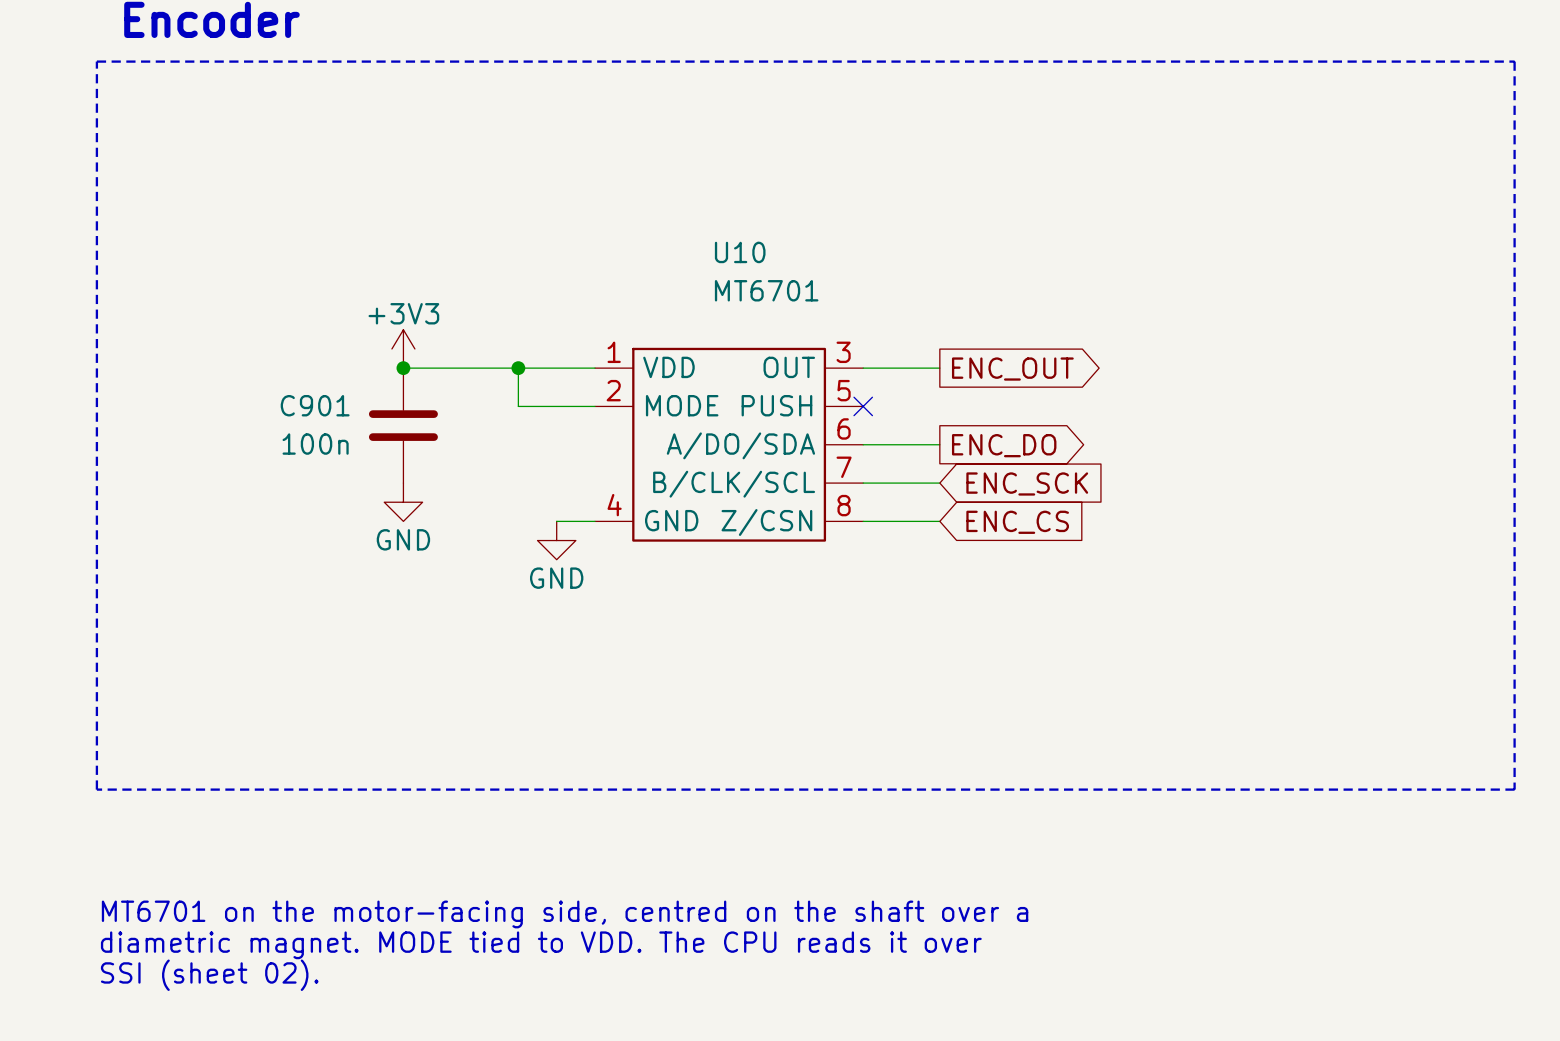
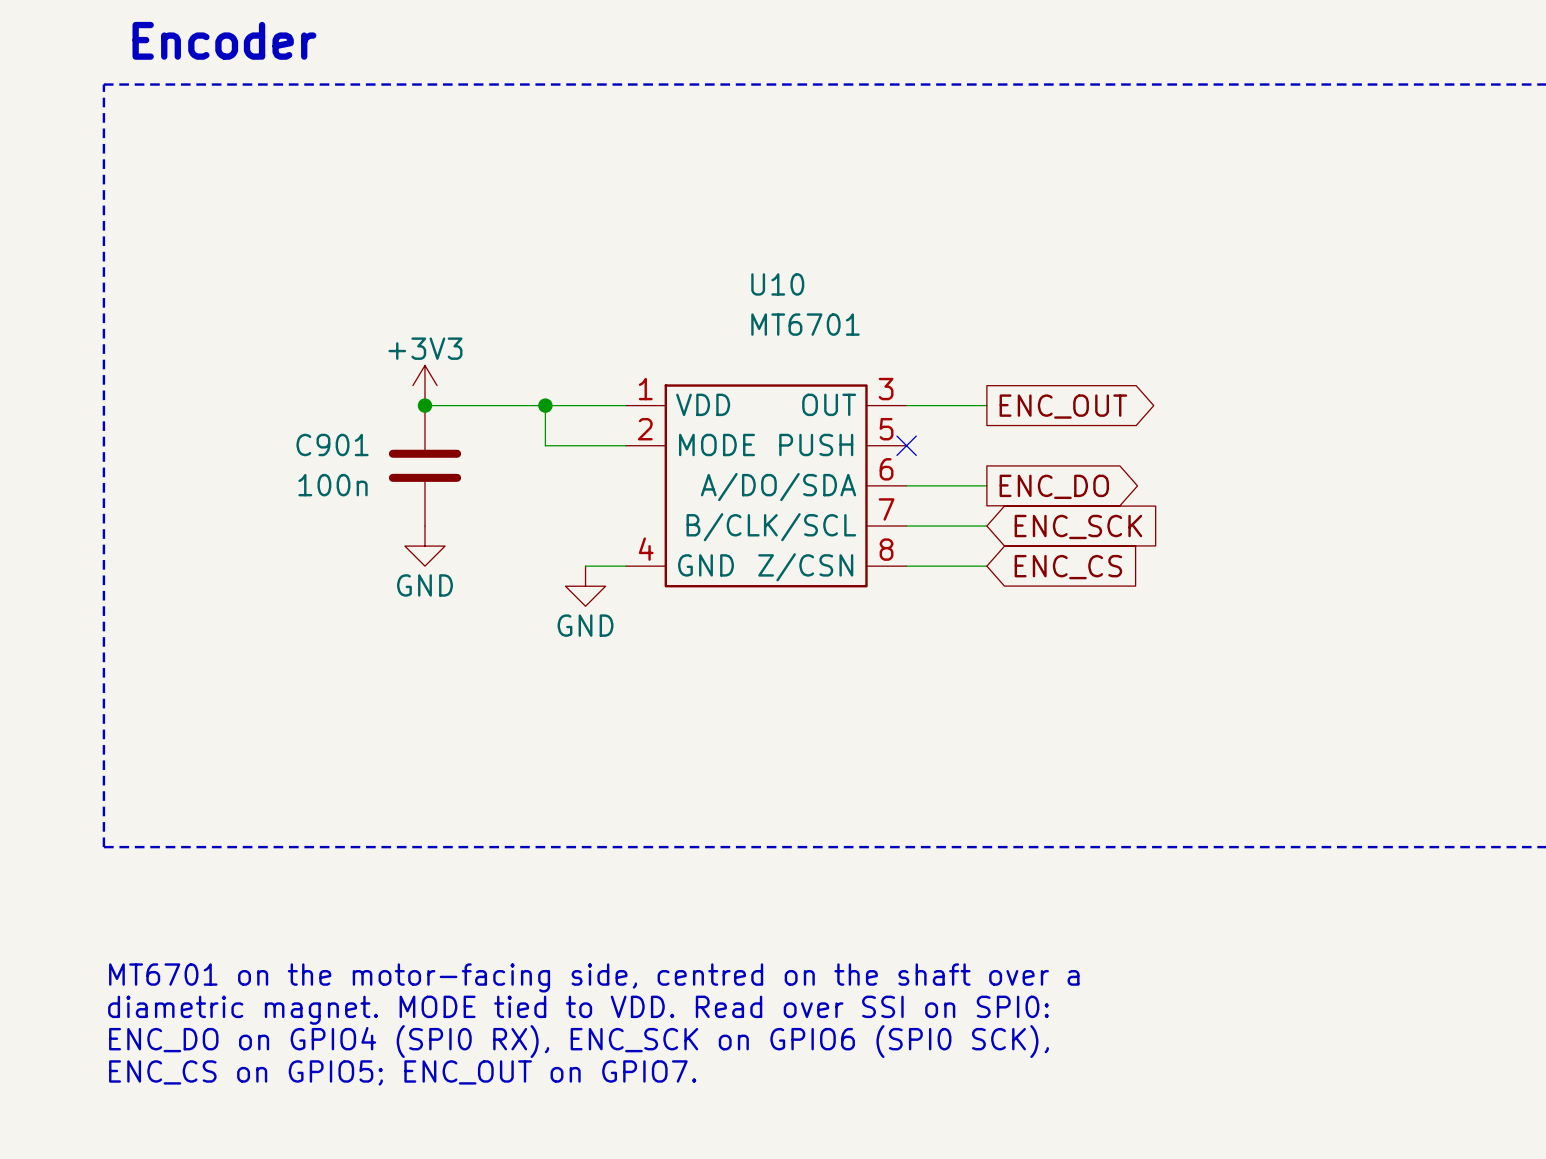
text: diametric magnet. MODE tied to VDD. The CPU reads it over (541, 945) -> diametric magnet. MODE tied to VDD. Read over SSI on SPI0: (578, 1010)
text: SSI (sheet 02). (209, 975) -> ENC_DO on GPIO4 (SPI0 RX), ENC_SCK on GPIO6 (SPI0 SCK), (578, 1041)
text: none -> ENC_CS on GPIO5; ENC_OUT on GPIO7. (402, 1072)

